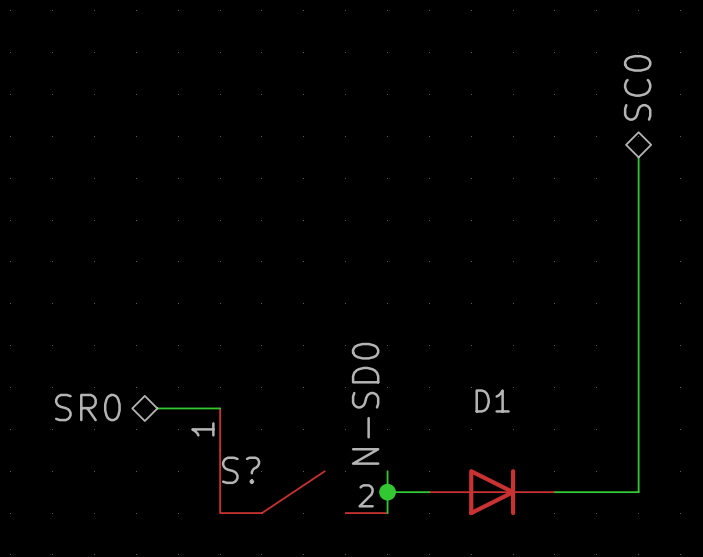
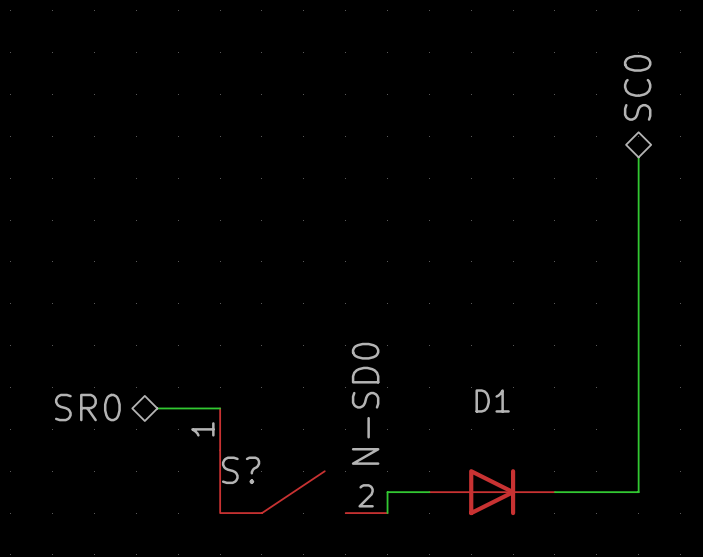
wire: (387, 471) (387, 492) -> none
junction: (387, 492) -> none

